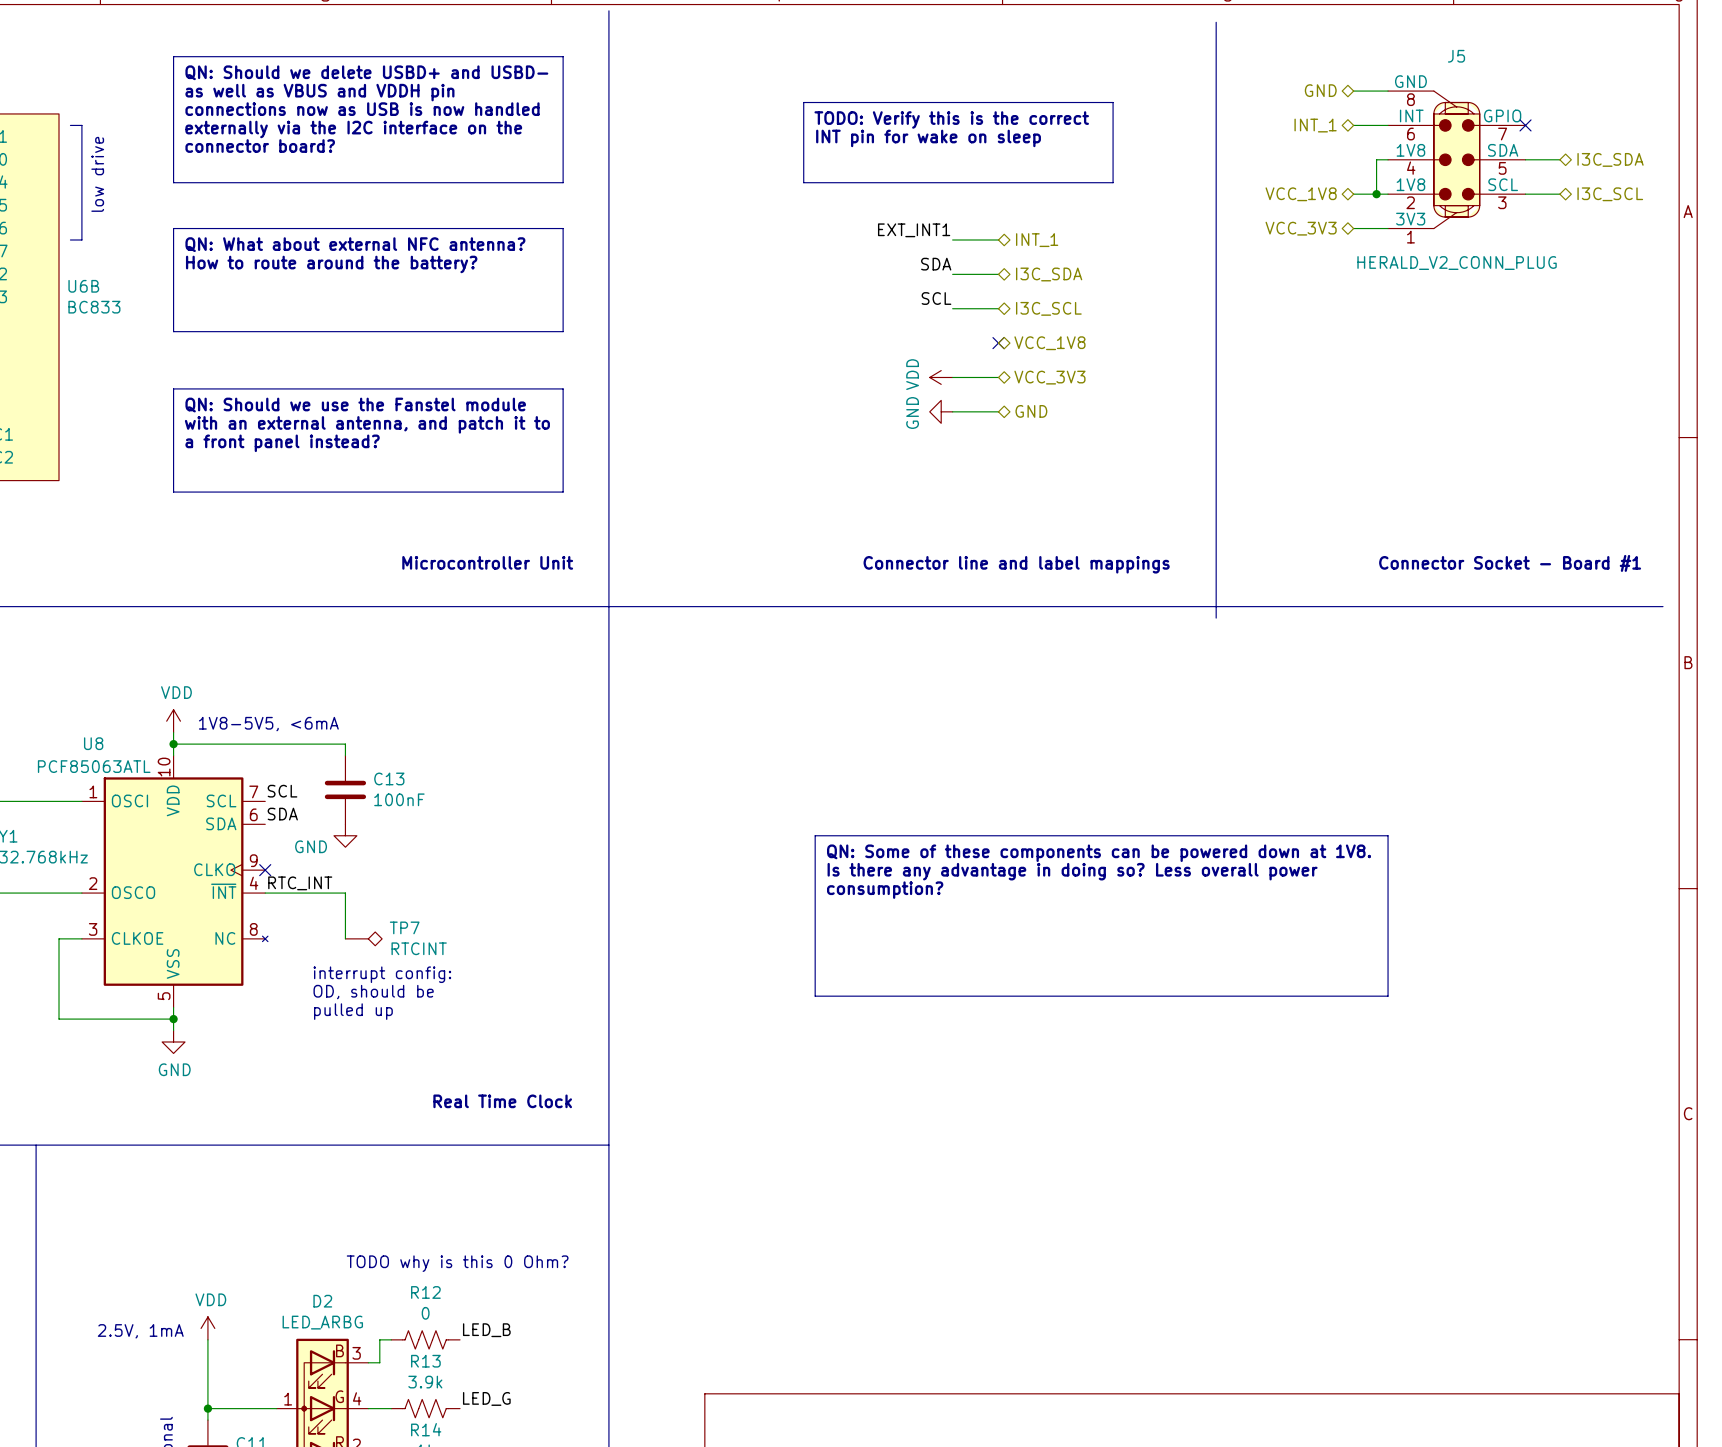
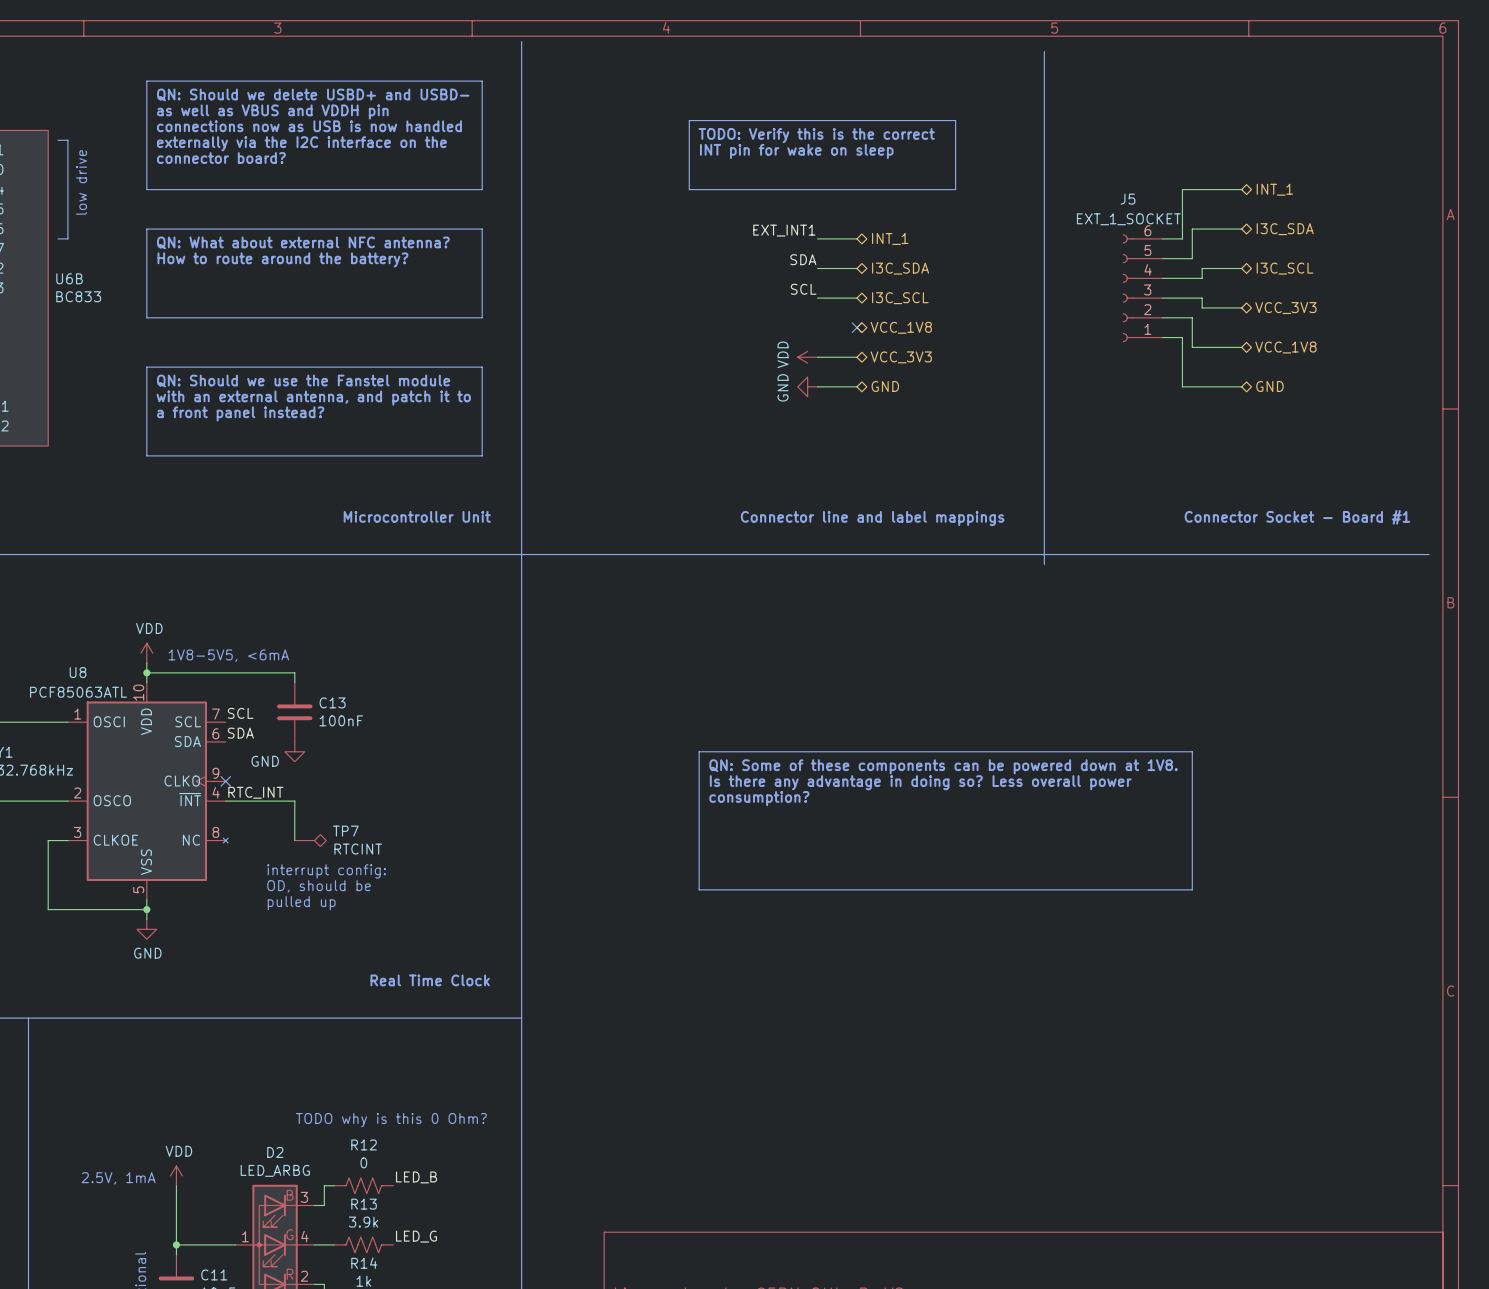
hierarchical label: GND (1320, 90) -> none
wire: (1353, 91) (1388, 91) -> none
J5 symbol: [1388, 91, 1526, 229] -> [1122, 234, 1163, 343]
hierarchical label rotation: 0° (1315, 125) -> 180° (1274, 189)
hierarchical label position: INT_1 (1315, 125) -> INT_1 (1274, 189)
wire: (1353, 125) (1388, 125) -> none
no-connect mark: (1525, 125) -> none
wire: (1388, 159) (1376, 159) (1376, 182) -> (1241, 189) (1182, 189)
wire: (1525, 159) (1559, 159) -> none
hierarchical label position: I3C_SDA (1610, 159) -> I3C_SDA (1285, 229)
hierarchical label rotation: 0° (1301, 194) -> 180° (1285, 347)
hierarchical label position: VCC_1V8 (1301, 194) -> VCC_1V8 (1285, 347)
wire: (1353, 194) (1388, 194) -> none
wire: none -> (1182, 199) (1182, 238) (1162, 238)
junction: (1376, 194) -> none
wire: (1525, 194) (1559, 194) -> none
hierarchical label position: I3C_SCL (1610, 194) -> I3C_SCL (1284, 268)
hierarchical label rotation: 0° (1301, 228) -> 180° (1285, 308)
hierarchical label position: VCC_3V3 (1301, 228) -> VCC_3V3 (1285, 308)
wire: (1353, 228) (1388, 228) -> none
wire: none -> (1241, 229) (1192, 229) (1192, 258) (1162, 258)
J5 value: HERALD_V2_CONN_PLUG (1457, 263) -> EXT_1_SOCKET (1128, 219)
wire: none -> (1241, 268) (1202, 268) (1202, 278) (1162, 278)
wire: none -> (1162, 298) (1202, 298) (1202, 307) (1241, 307)
wire: none -> (1162, 317) (1192, 317) (1192, 347) (1241, 347)
wire: none -> (1162, 337) (1182, 337) (1182, 386) (1241, 386)
hierarchical label: none -> GND (1269, 386)

